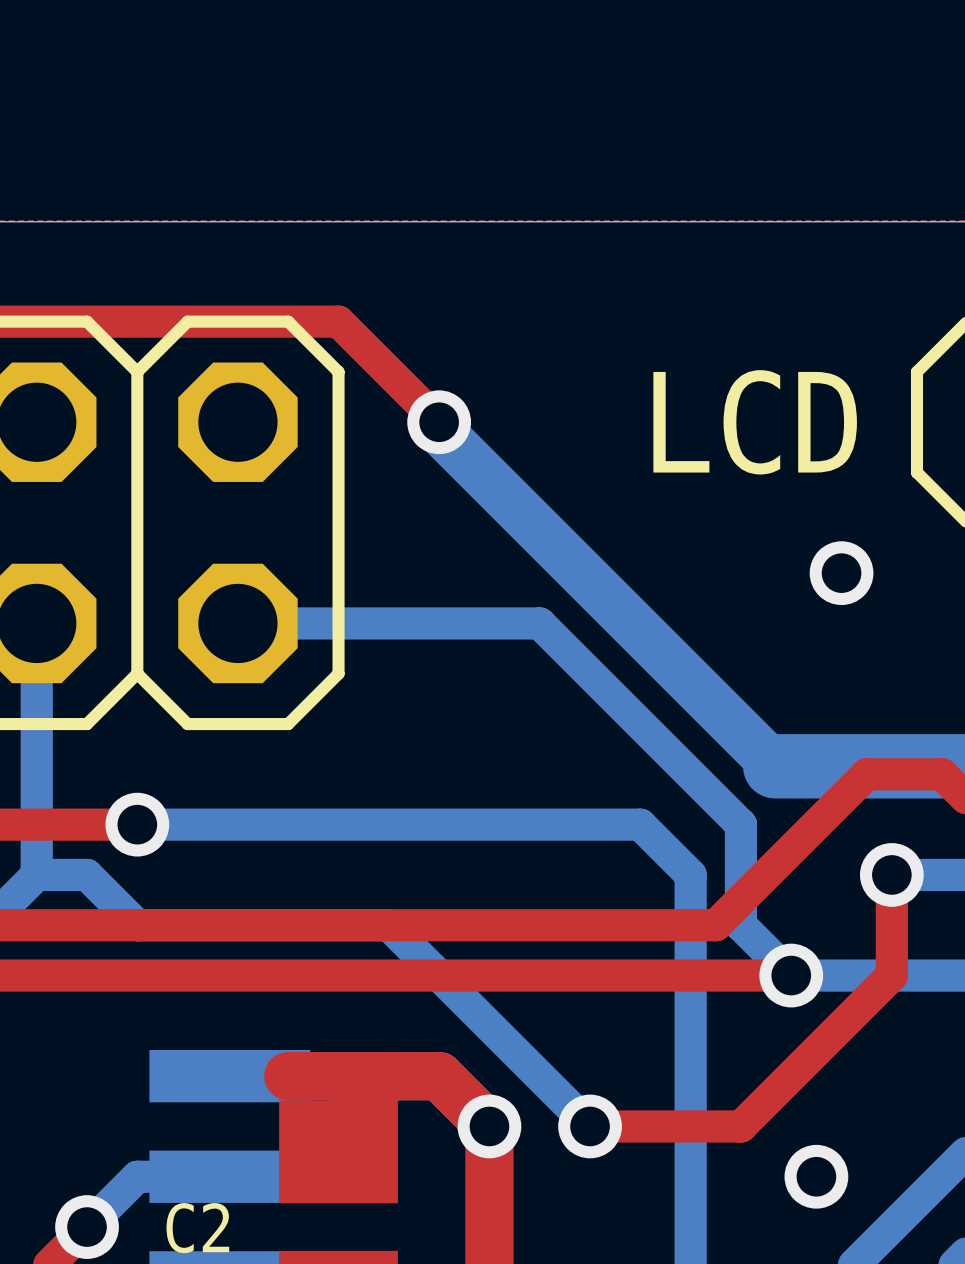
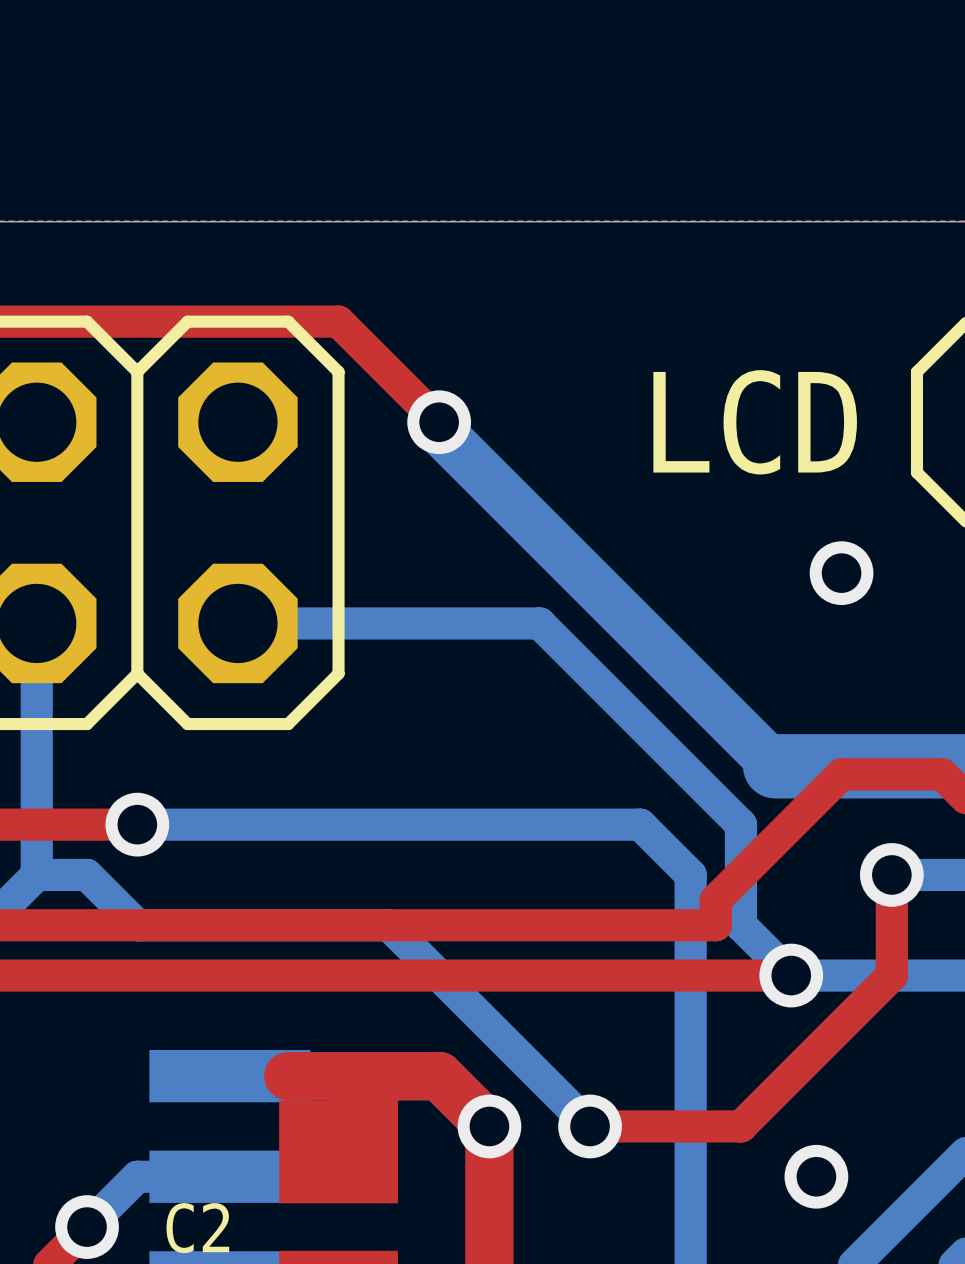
top track: (866, 774) (715, 925) -> (866, 774) (841, 774) (715, 900) (715, 925)

